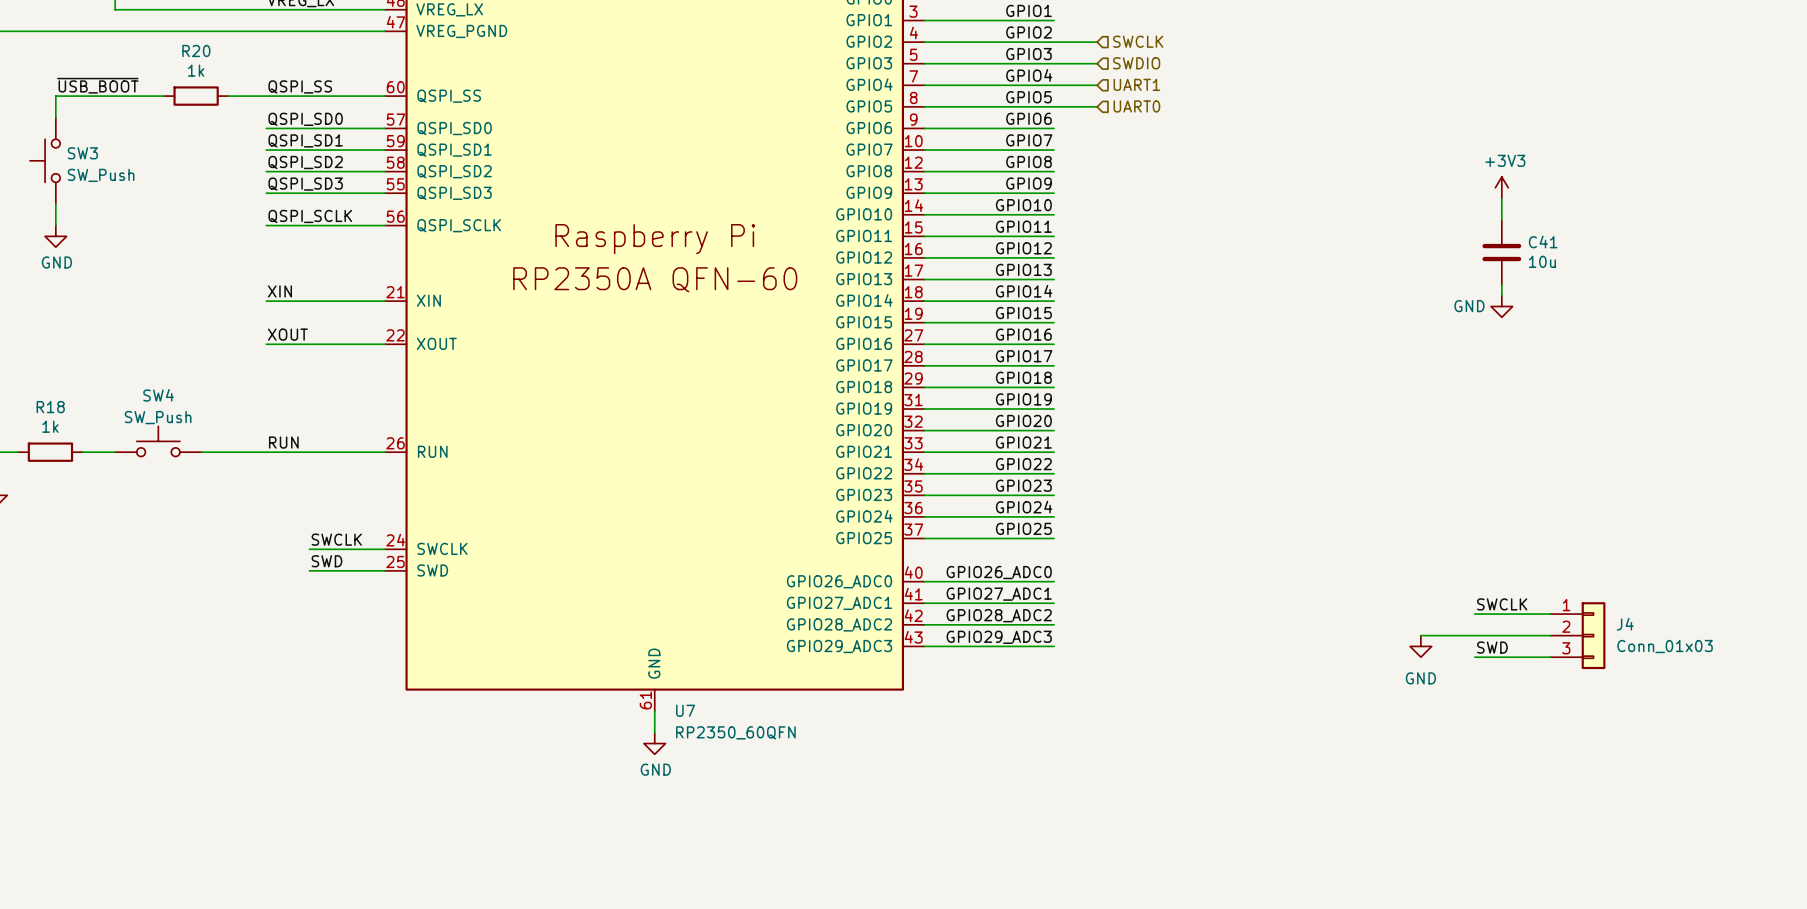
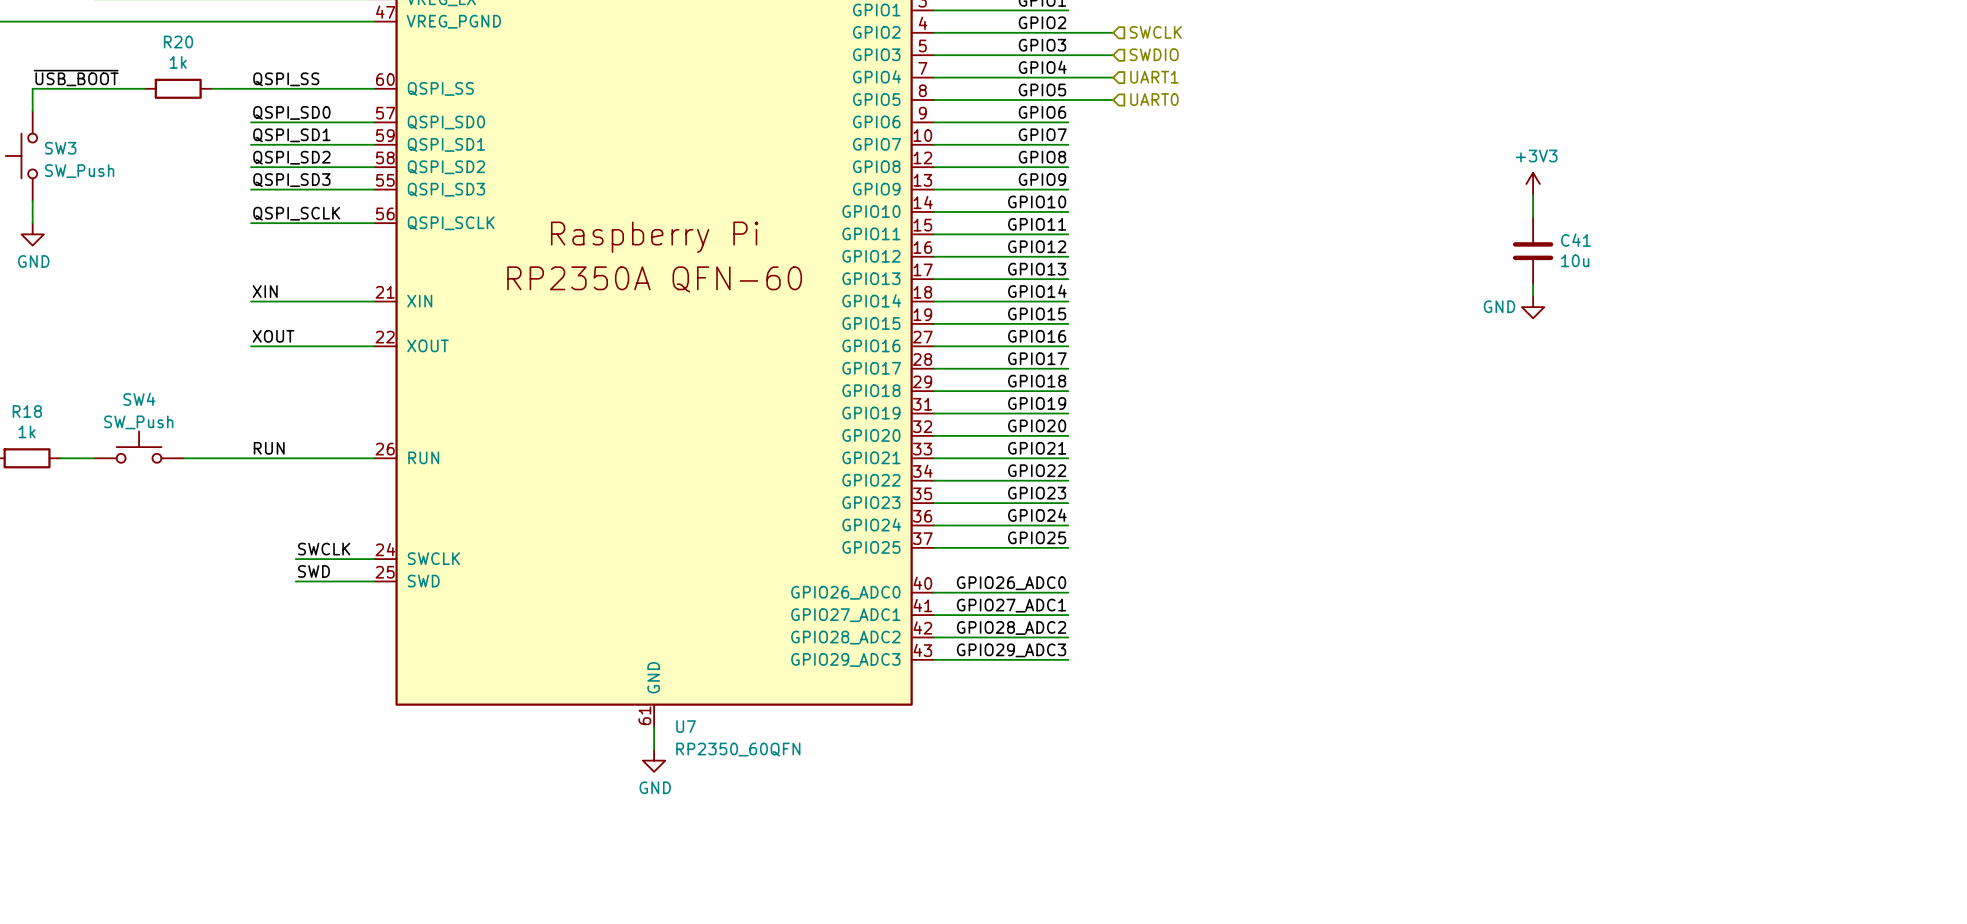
label: SWCLK (1502, 604) -> none
wire: (1474, 614) (1550, 614) -> none
wire: (1420, 635) (1550, 635) -> none
J4: Conn_01x03 (1577, 635) -> none
power symbol: GND (1420, 646) -> none
label: SWD (1492, 647) -> none
wire: (1474, 657) (1550, 657) -> none

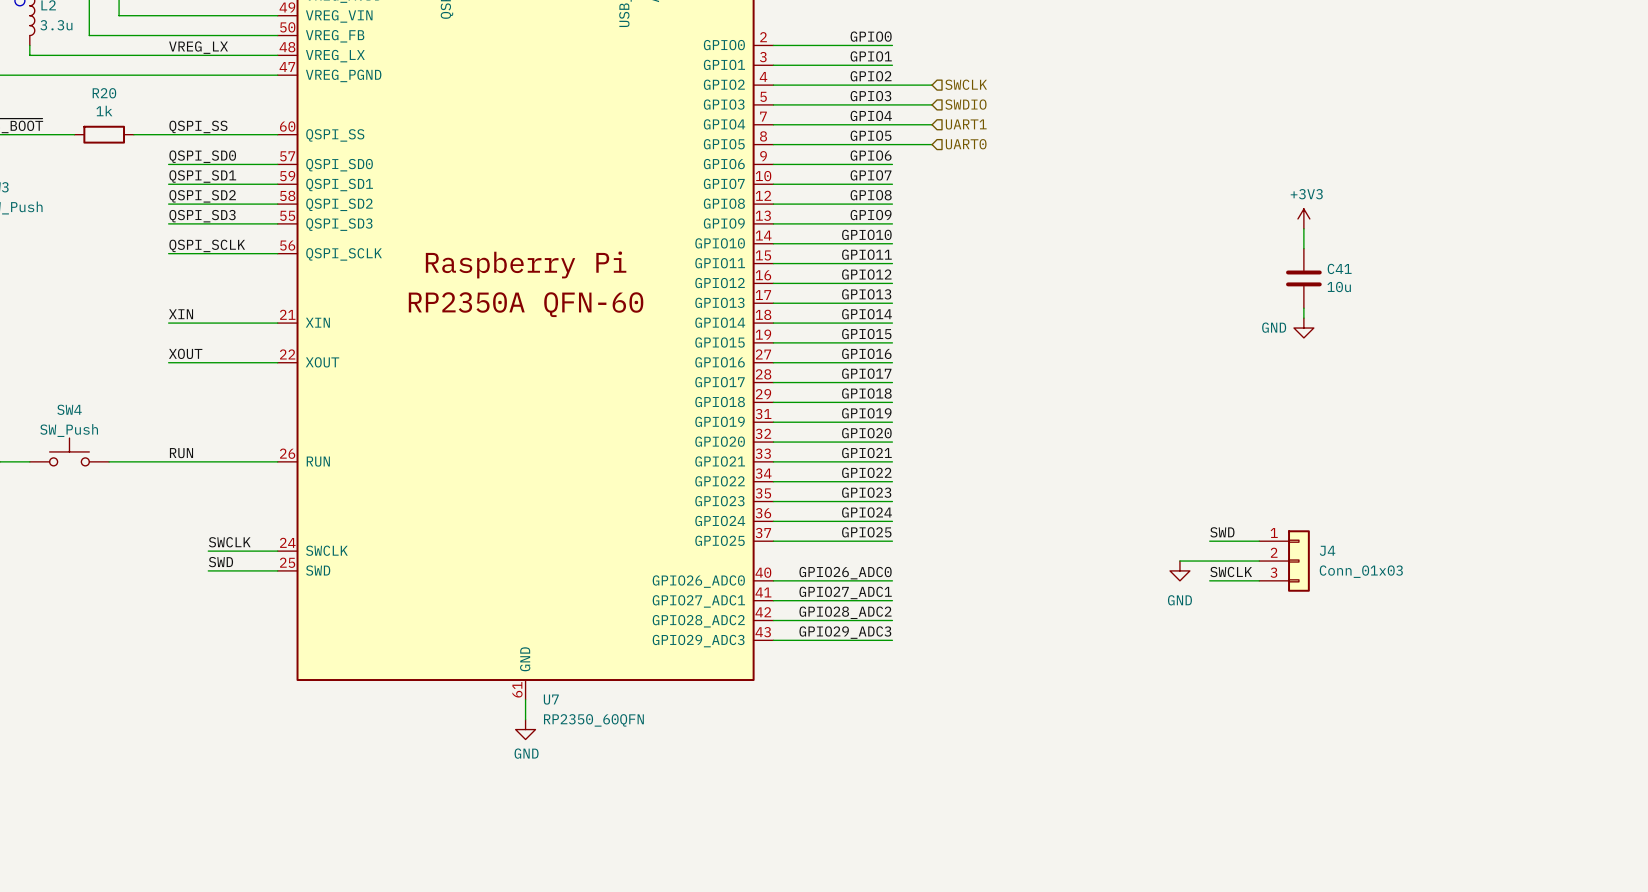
label: none -> SWD (1222, 532)
wire: none -> (1209, 541) (1259, 541)
wire: none -> (1179, 561) (1259, 561)
J4: none -> Conn_01x03 (1284, 561)
power symbol: none -> GND (1179, 570)
label: none -> SWCLK (1231, 572)
wire: none -> (1209, 580) (1259, 580)

